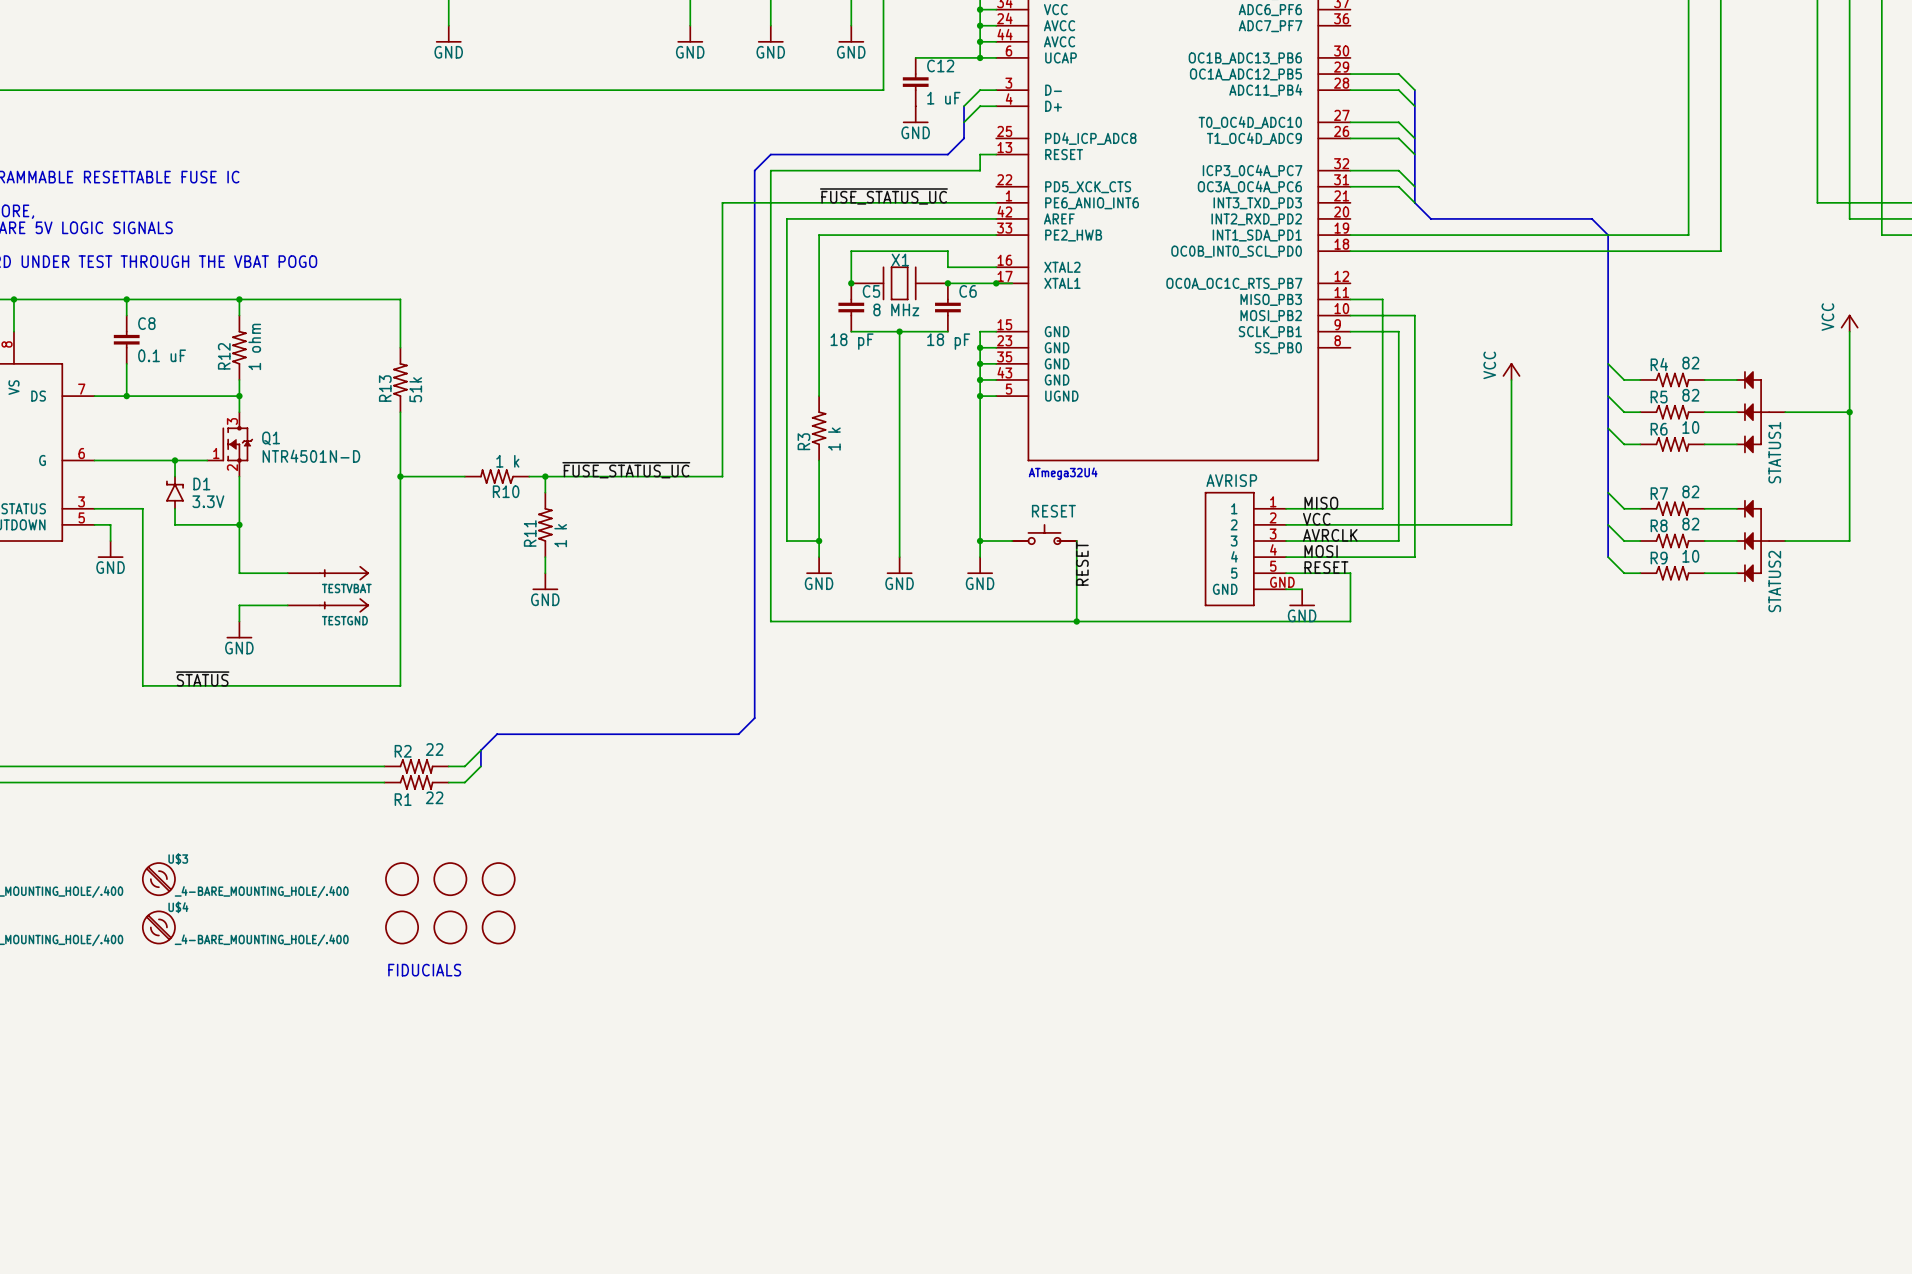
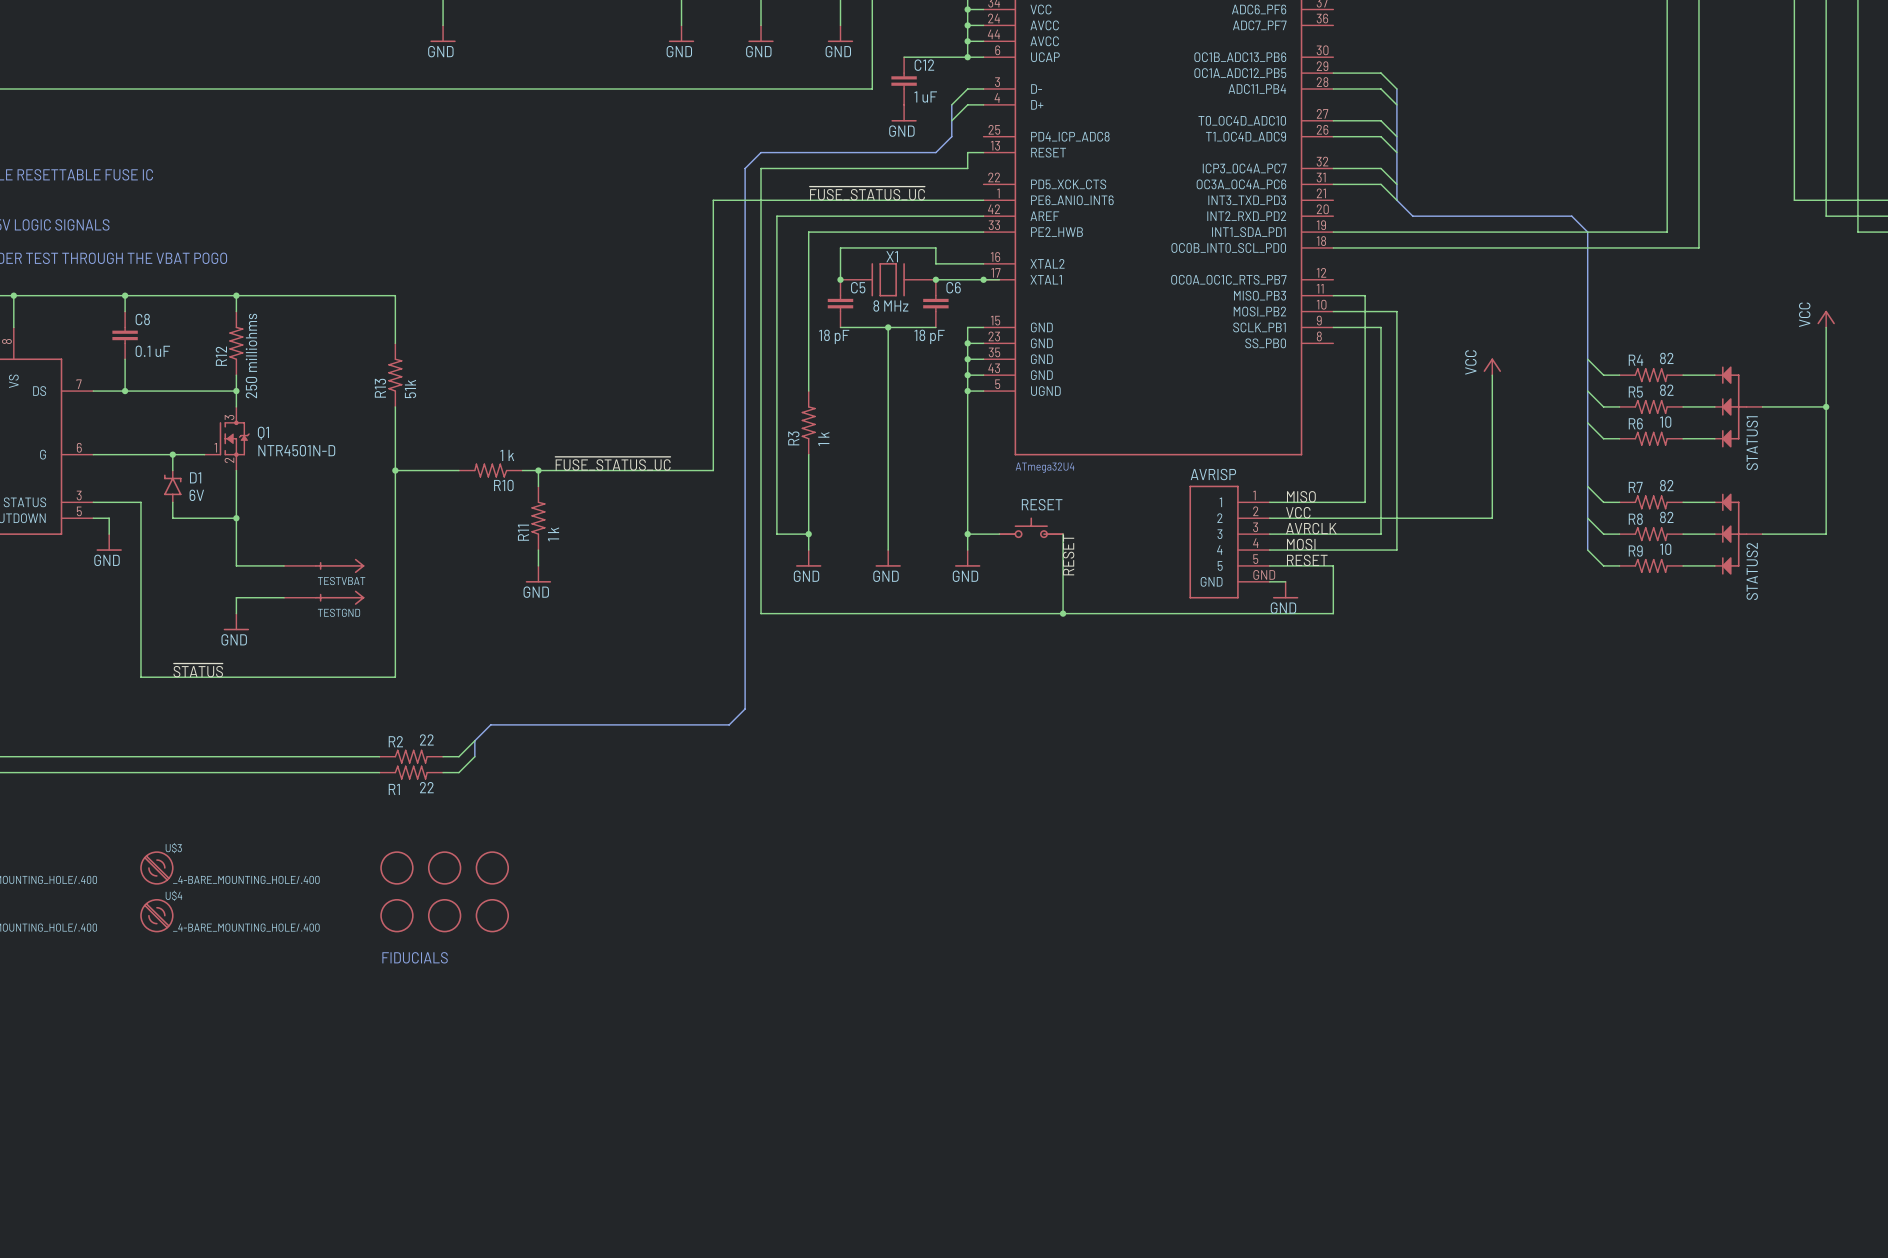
R12 value: 1 ohm (254, 346) -> 250 milliohms (251, 355)
D1 value: 3.3V (208, 501) -> 6V (196, 495)

